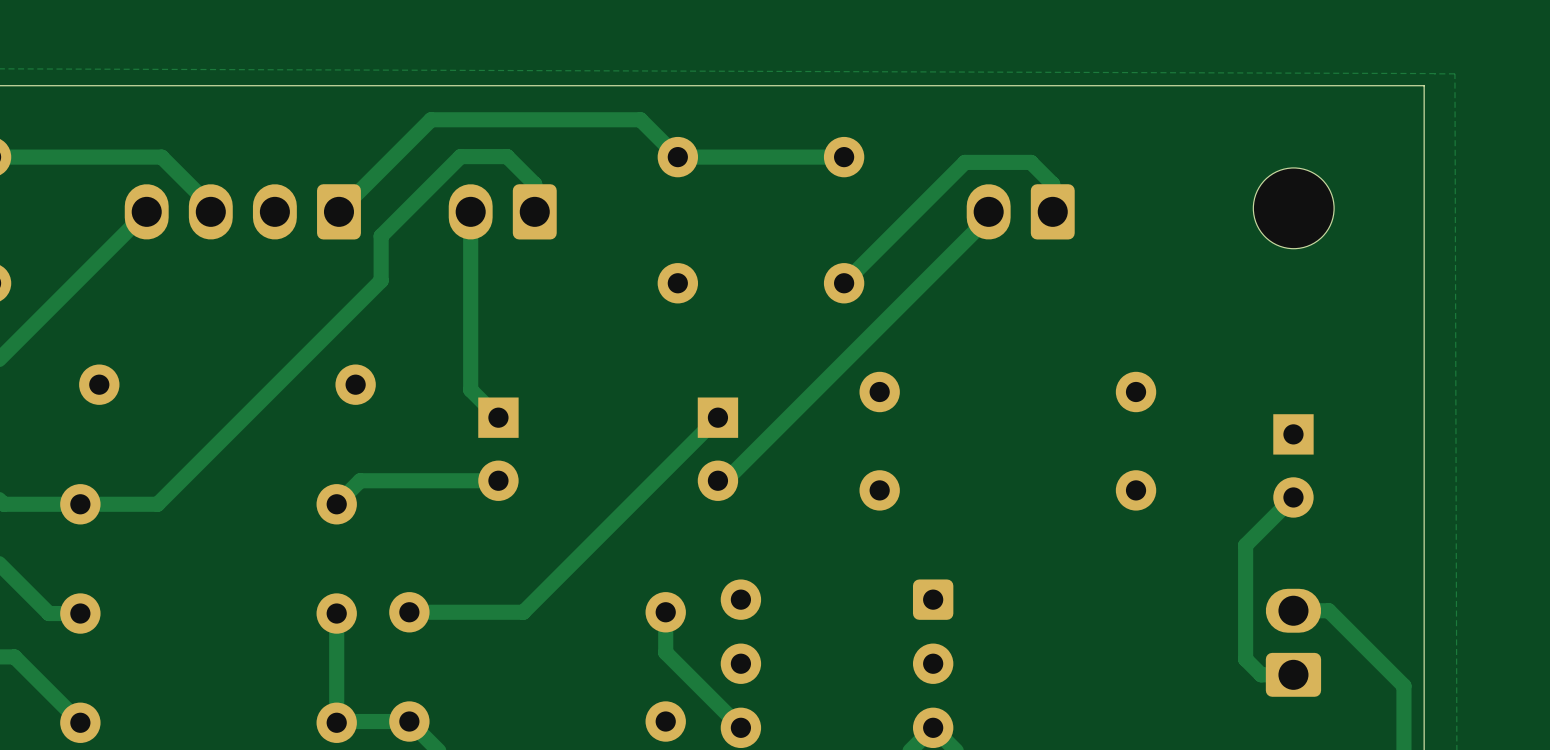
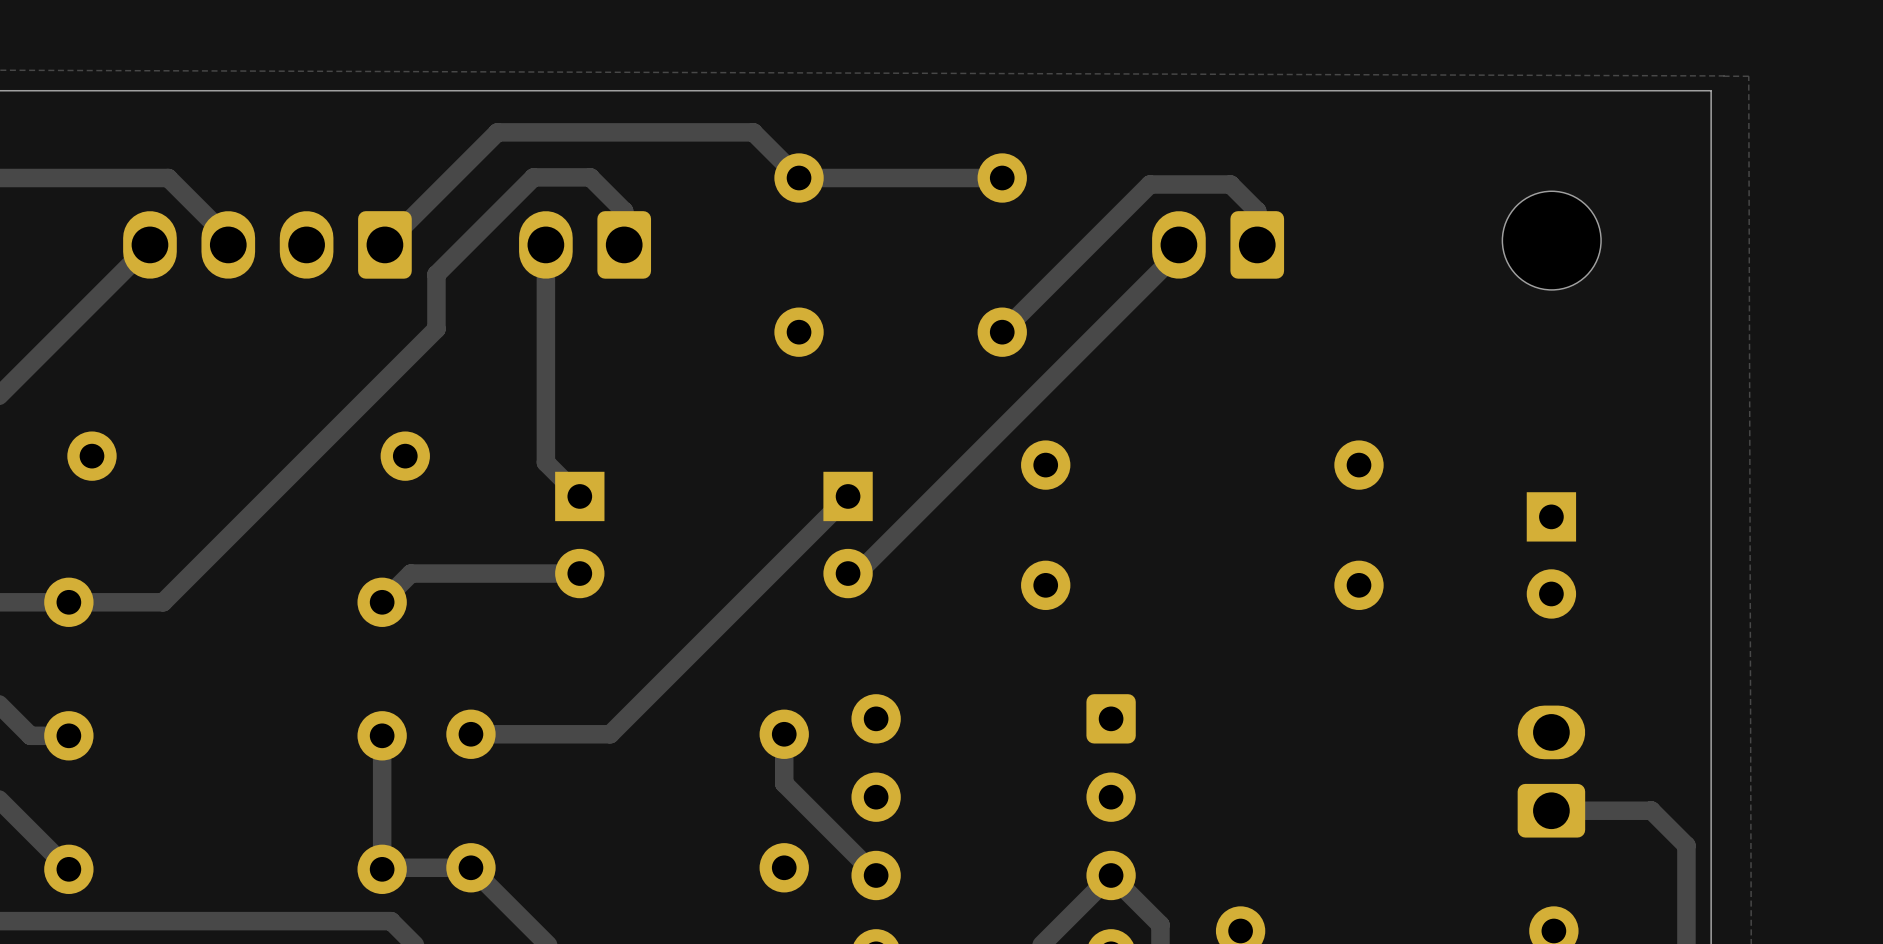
track: (1293, 497) (1245, 545) (1245, 659) (1261, 674) (1293, 674) -> (1651, 810) (1551, 810)
track: (1293, 610) (1328, 610) (1403, 685) (1403, 703) -> (1651, 810) (1686, 845)

